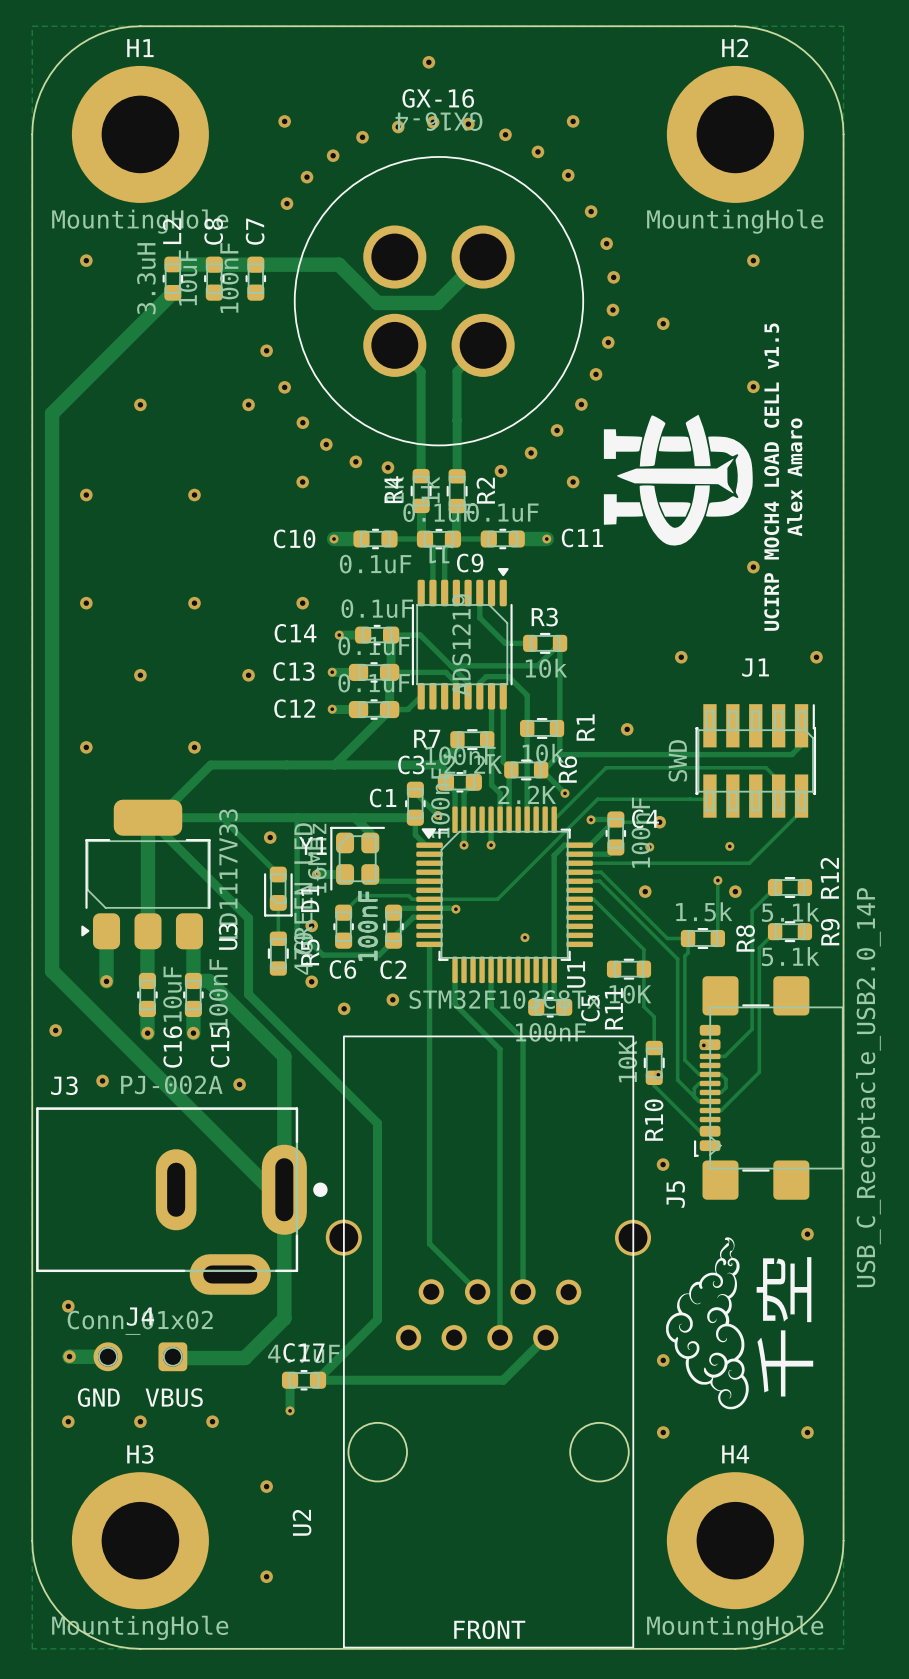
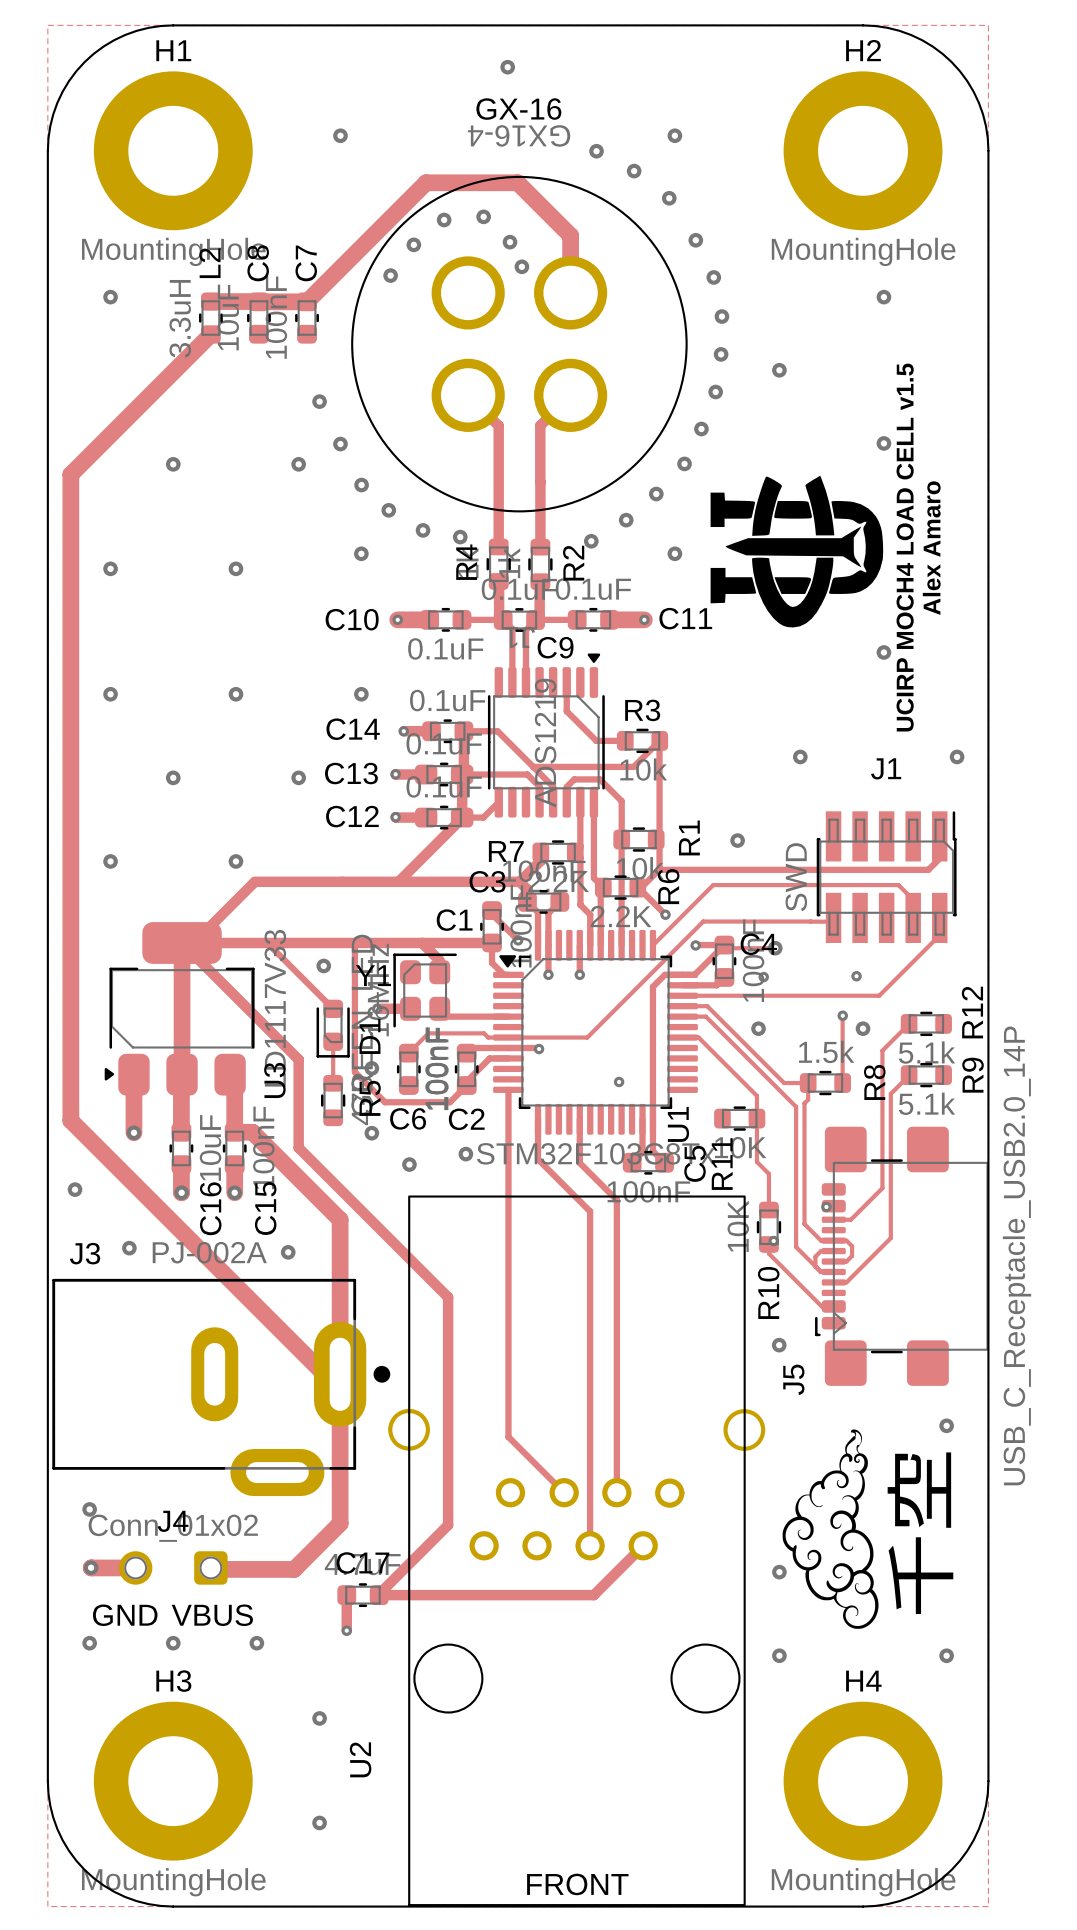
via: (433, 122) -> none
via: (468, 124) -> none
via: (398, 127) -> none
via: (362, 137) -> none
via: (333, 155) -> none
via: (307, 177) -> none
via: none -> (483, 216)
via: none -> (444, 219)
via: (286, 203) -> none
via: none -> (509, 242)
via: none -> (413, 244)
via: none -> (521, 266)
via: none -> (390, 275)
track: (483, 257) (437, 302) (377, 302) (338, 264) (255, 264) -> (570, 292) (570, 235) (517, 182) (426, 182) (307, 301)

